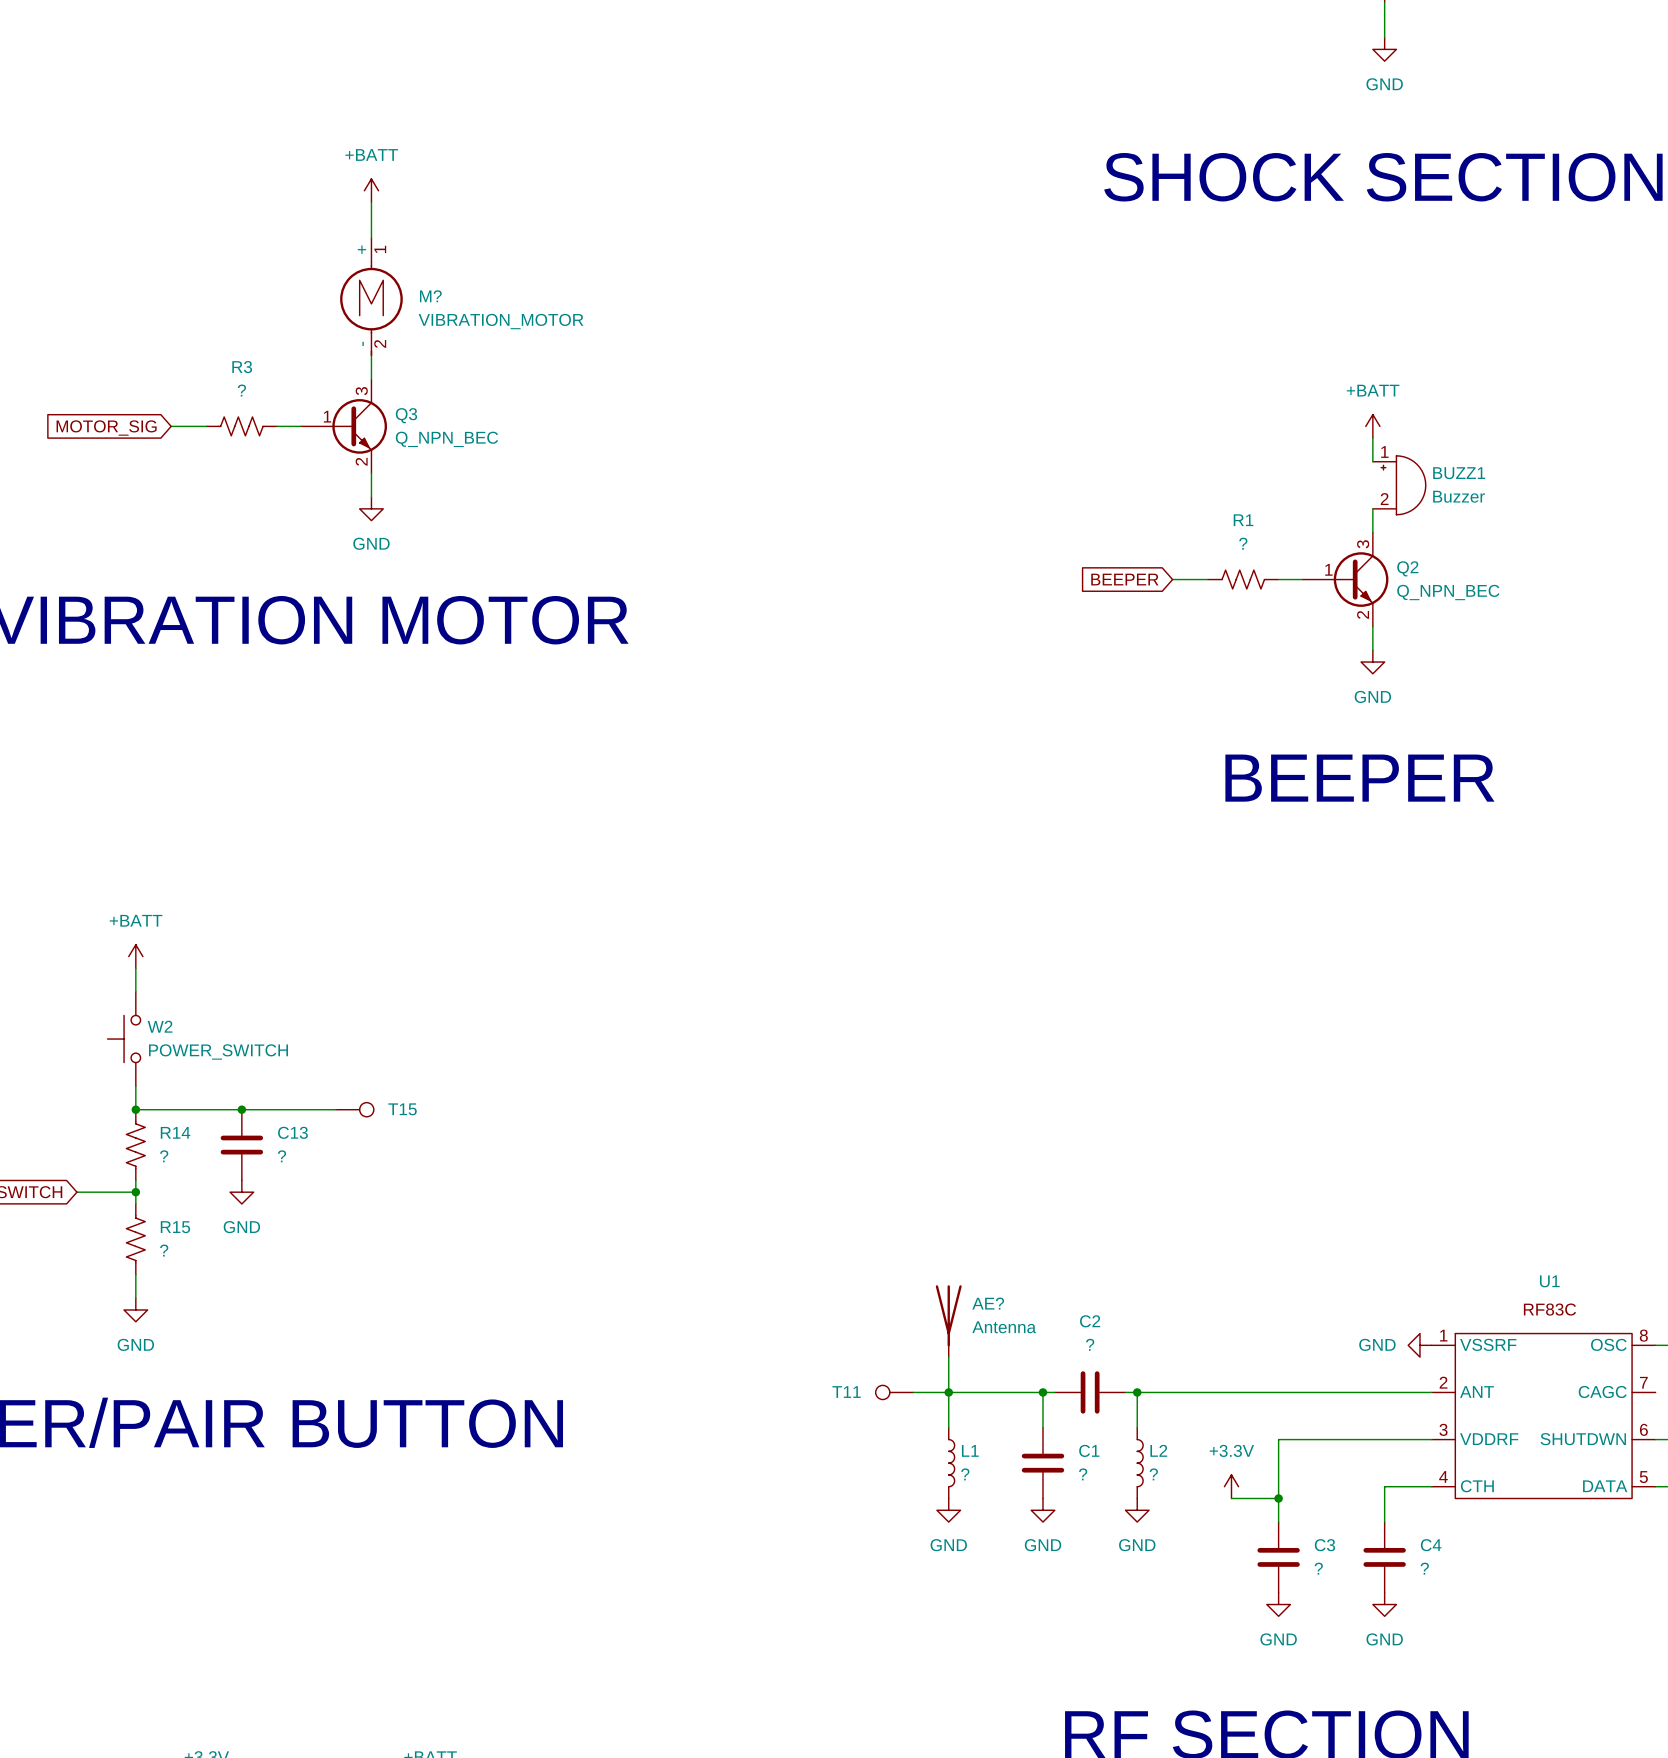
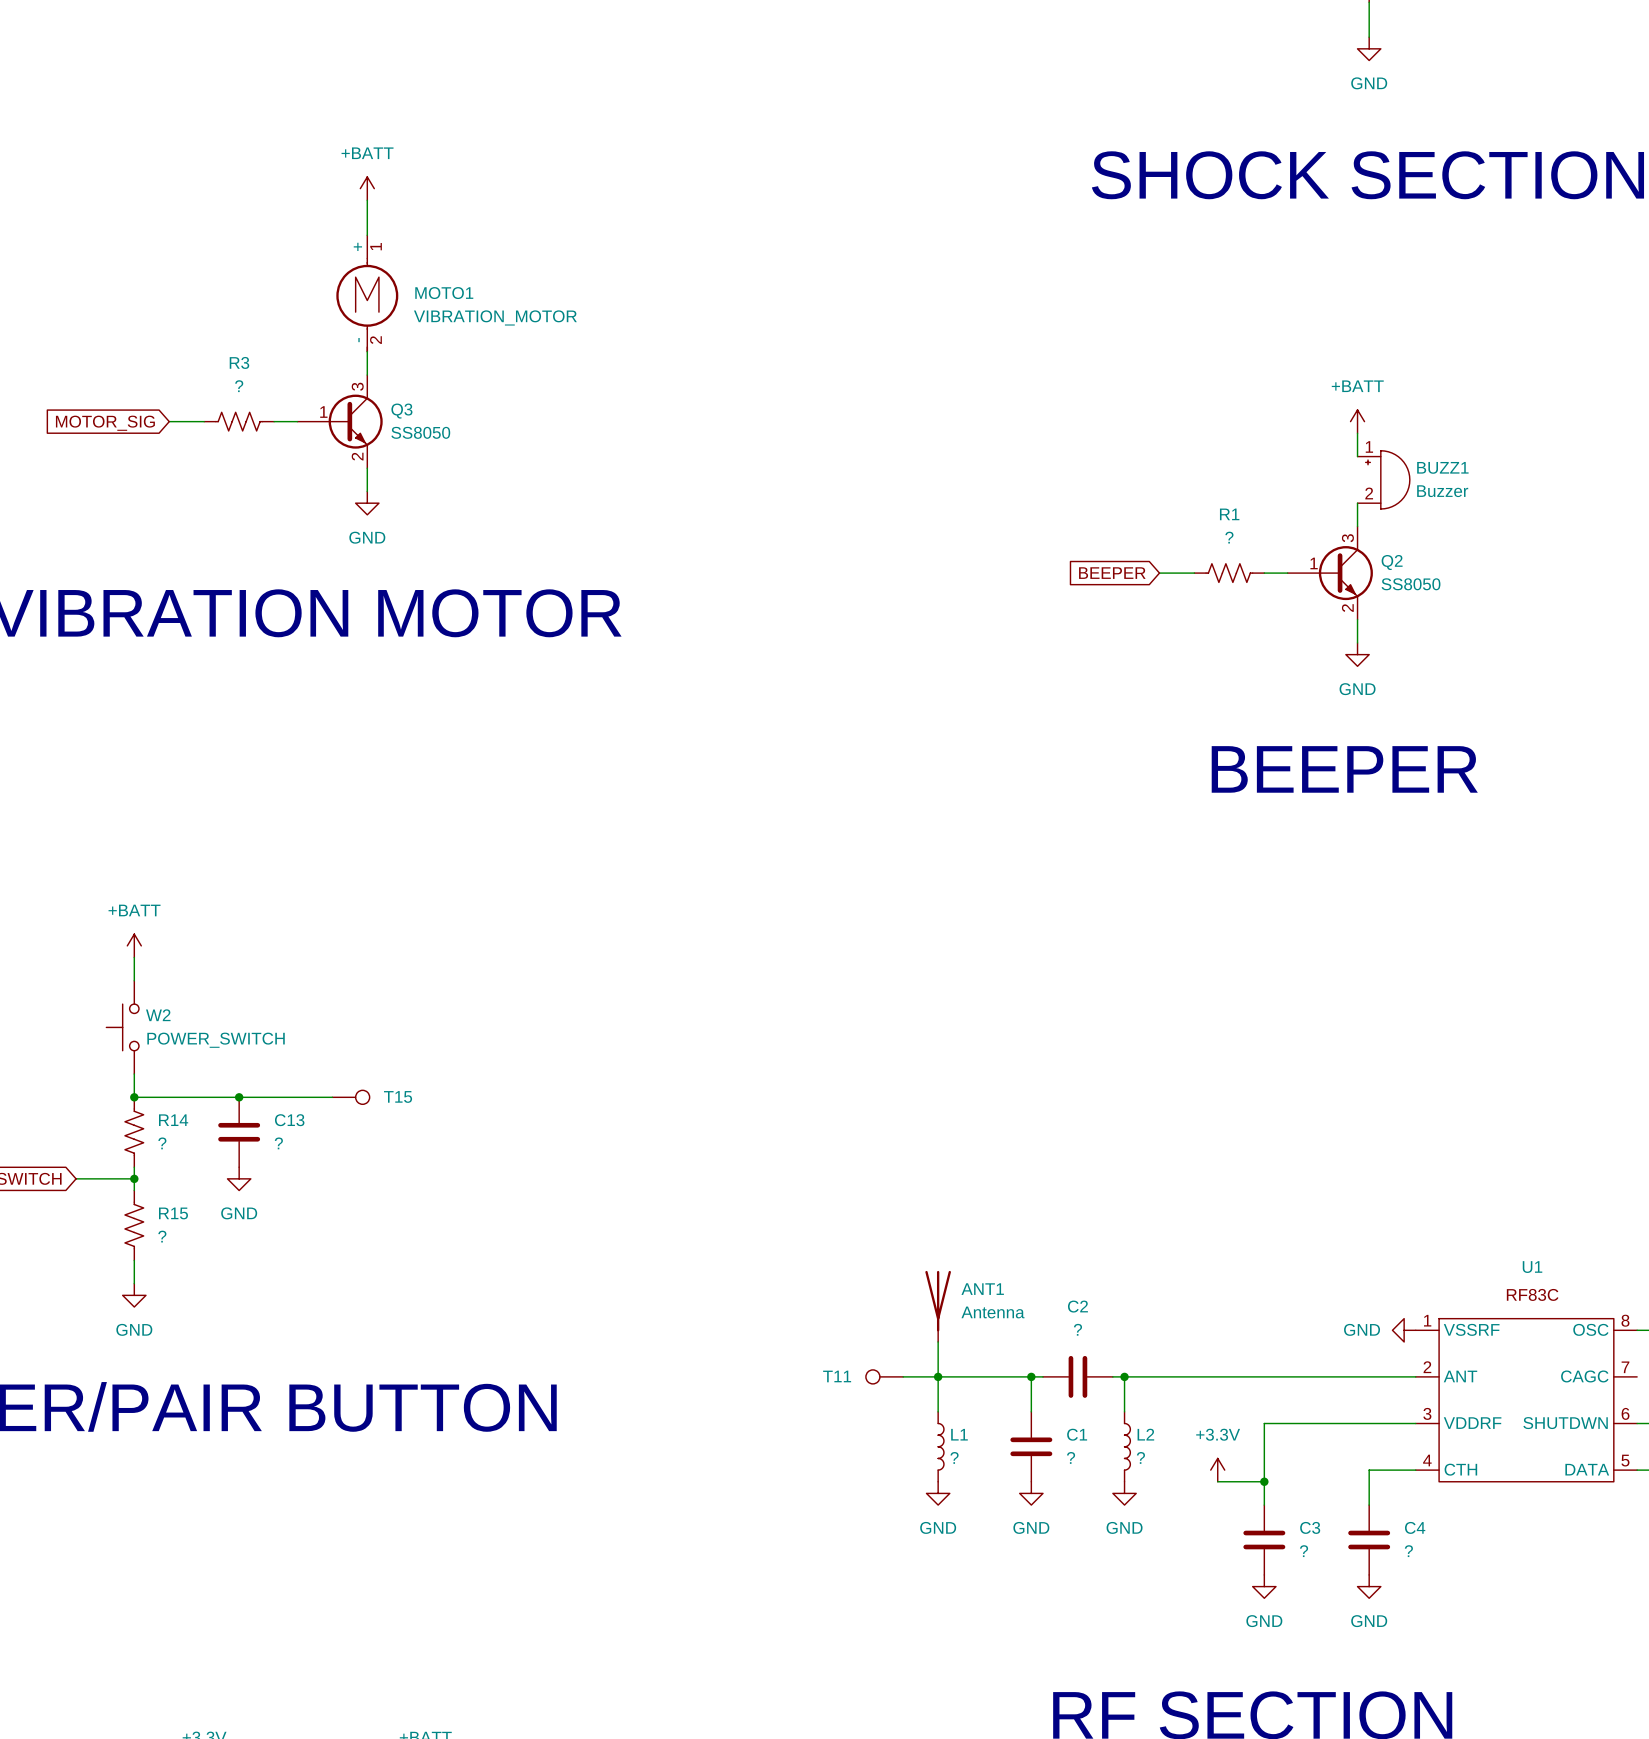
M? name: M? (430, 296) -> MOTO1 (444, 293)
Q3 value: Q_NPN_BEC (446, 439) -> SS8050 (420, 432)
Q2 value: Q_NPN_BEC (1448, 592) -> SS8050 (1411, 584)
AE? name: AE? (988, 1303) -> ANT1 (982, 1289)

